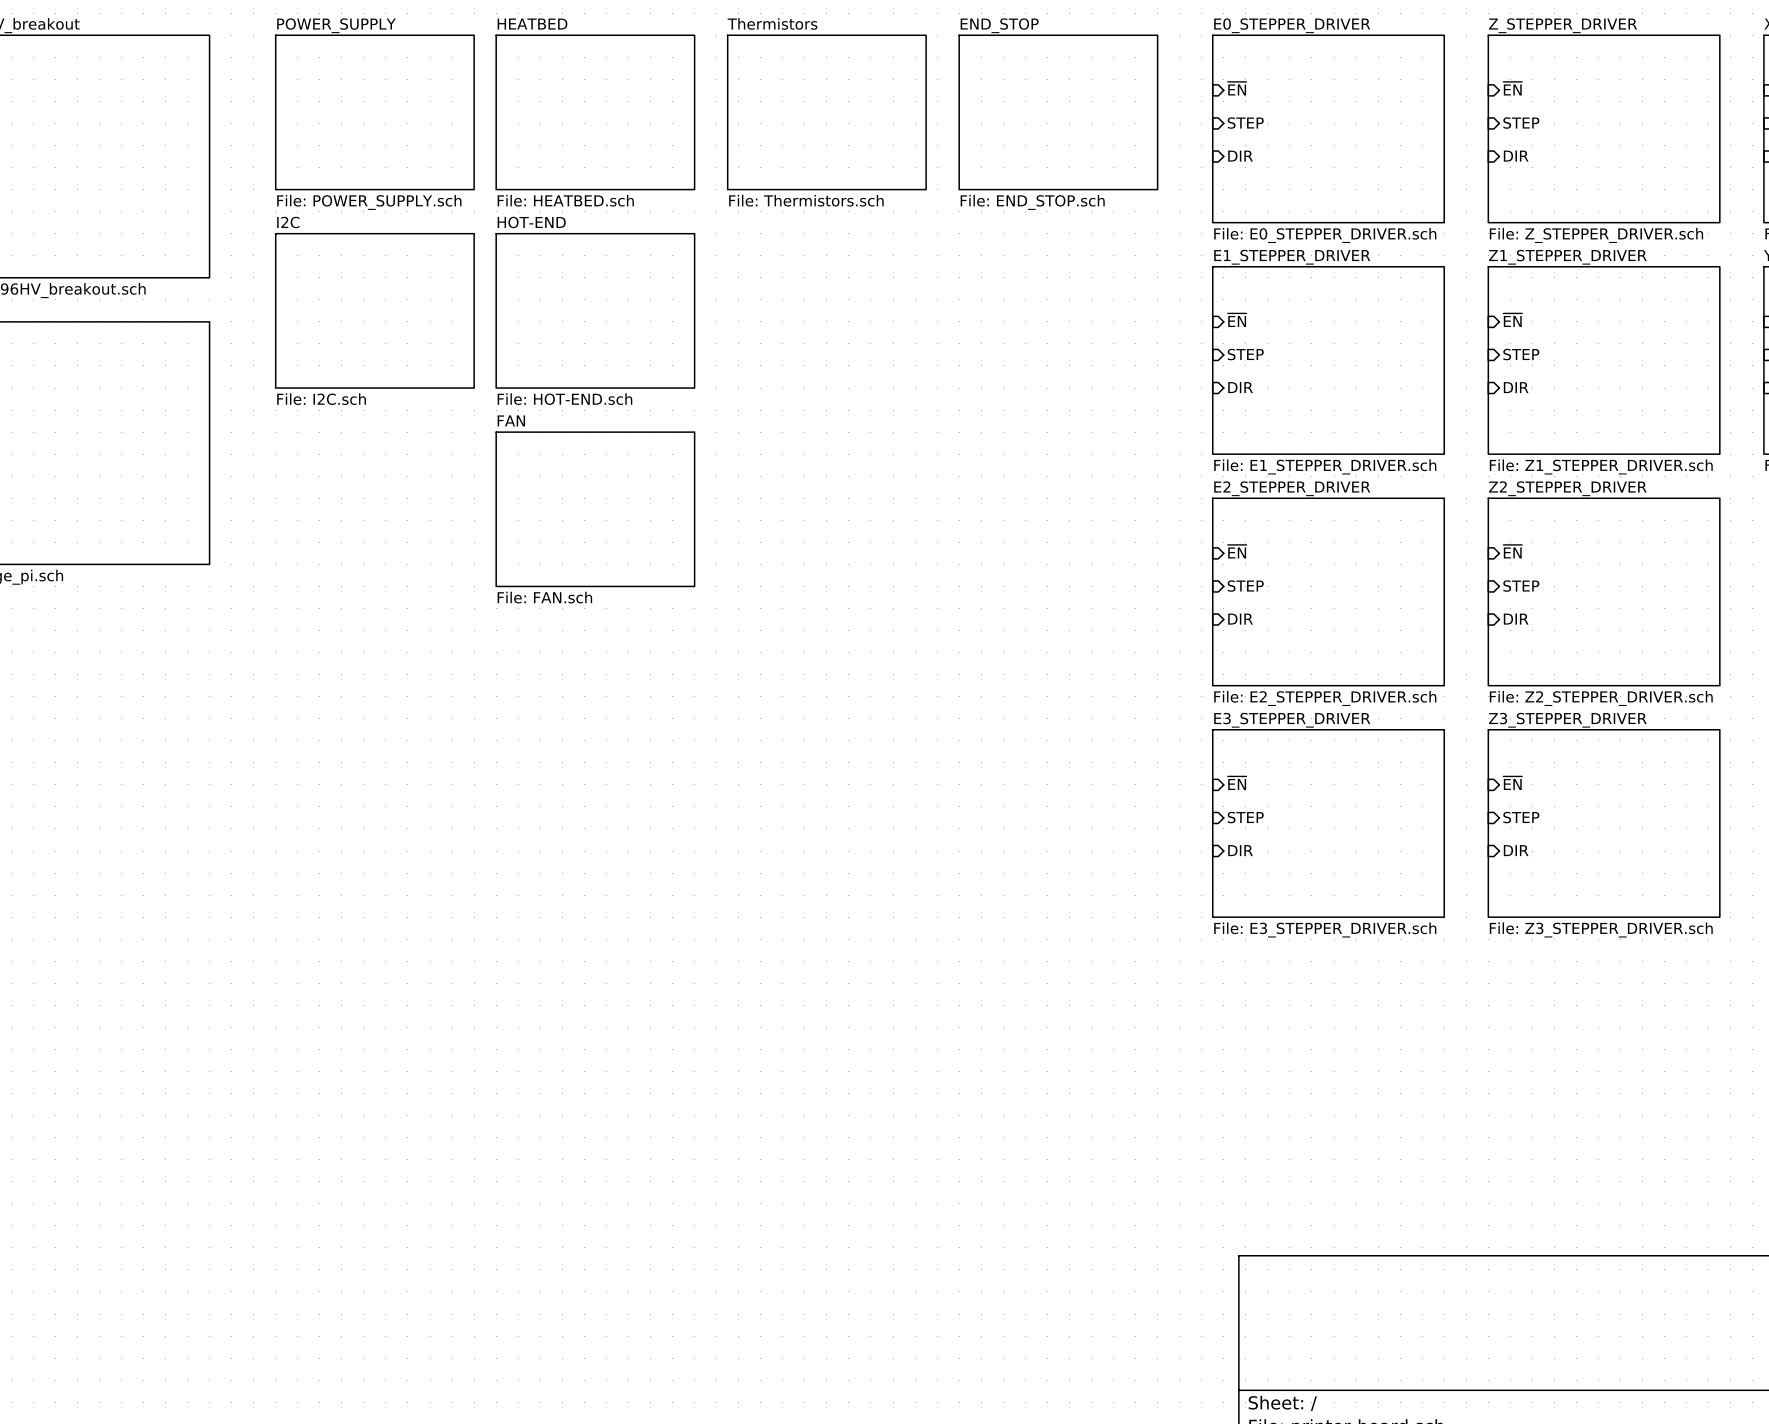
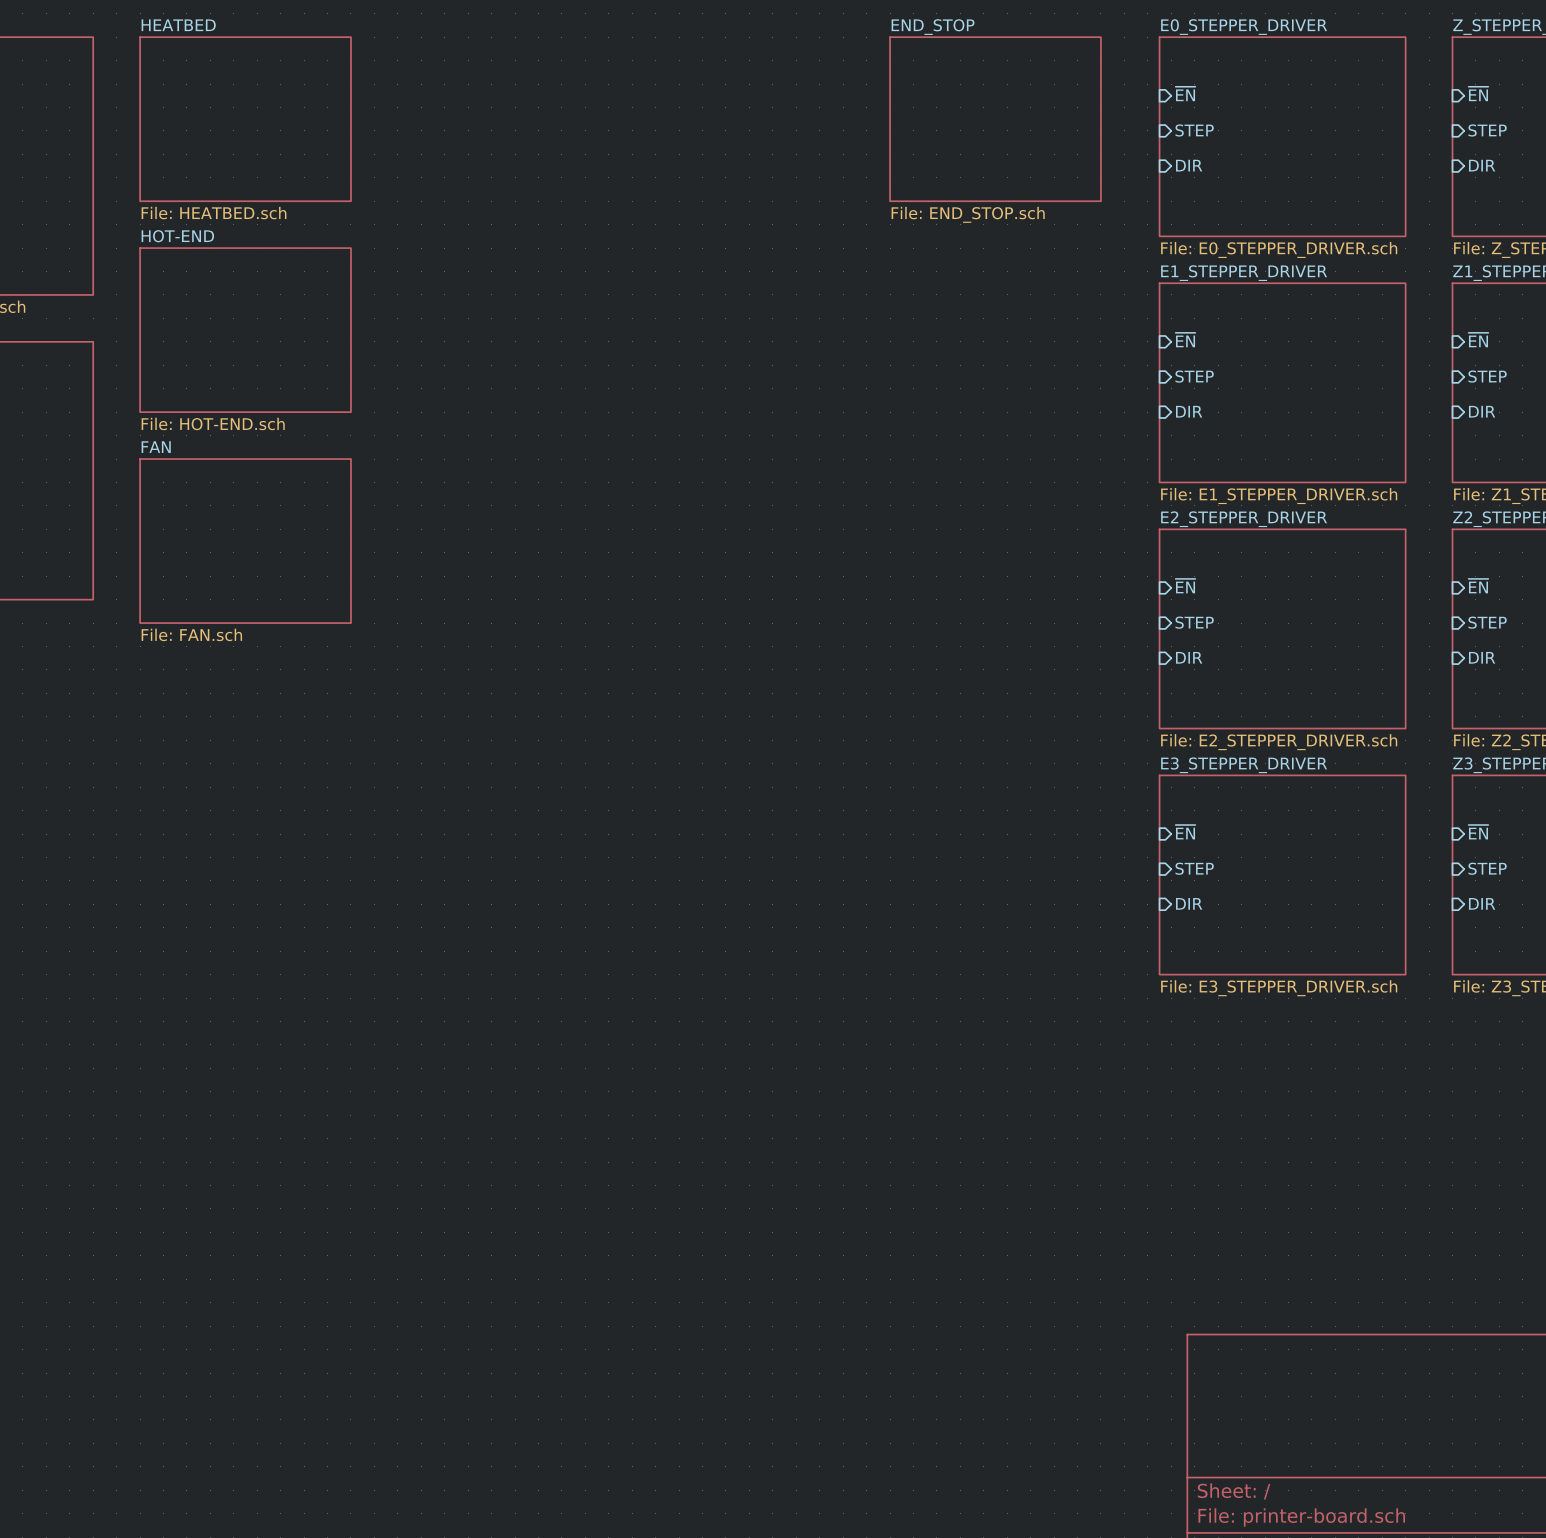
sheet HEATBED: none -> File: HEATBED.sch (245, 119)
sheet POWER_SUPPLY: File: POWER_SUPPLY.sch (374, 112) -> none
sheet HEATBED: File: HEATBED.sch (595, 112) -> none
sheet Thermistors: File: Thermistors.sch (826, 112) -> none
sheet HOT-END: none -> File: HOT-END.sch (245, 330)
sheet I2C: File: I2C.sch (374, 310) -> none
sheet HOT-END: File: HOT-END.sch (595, 310) -> none
sheet FAN: none -> File: FAN.sch (245, 541)
sheet FAN: File: FAN.sch (595, 509) -> none

